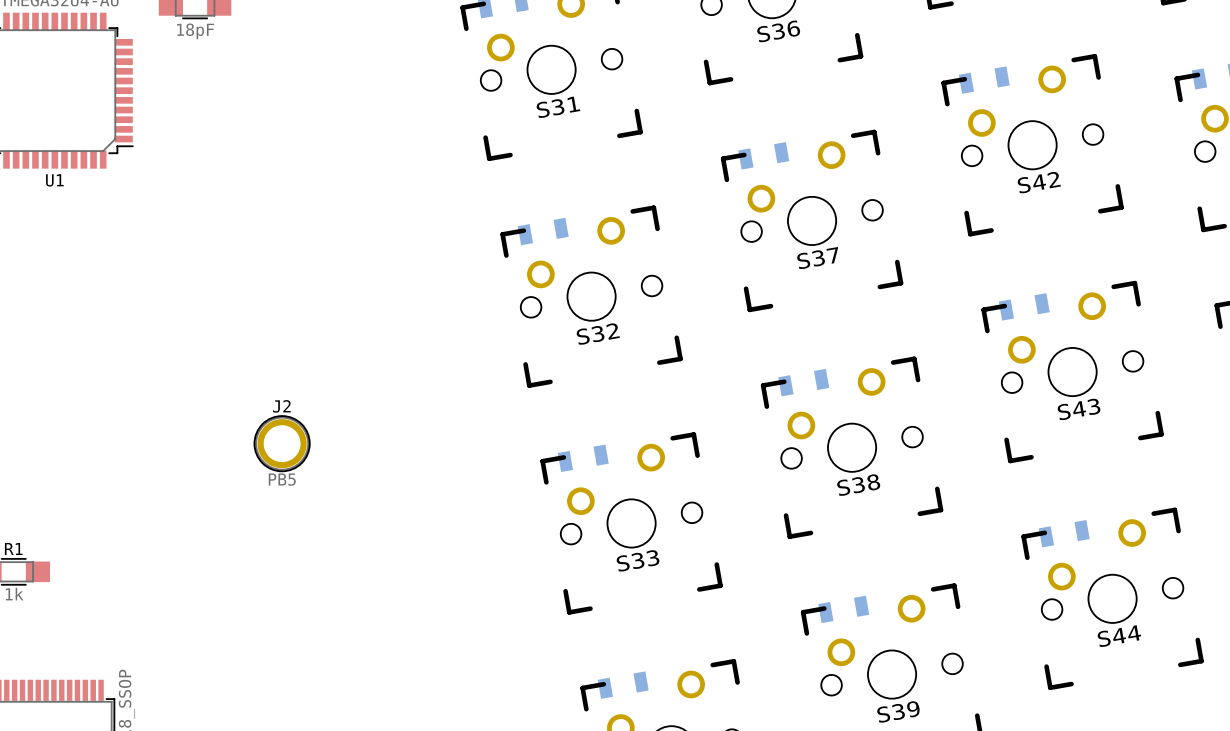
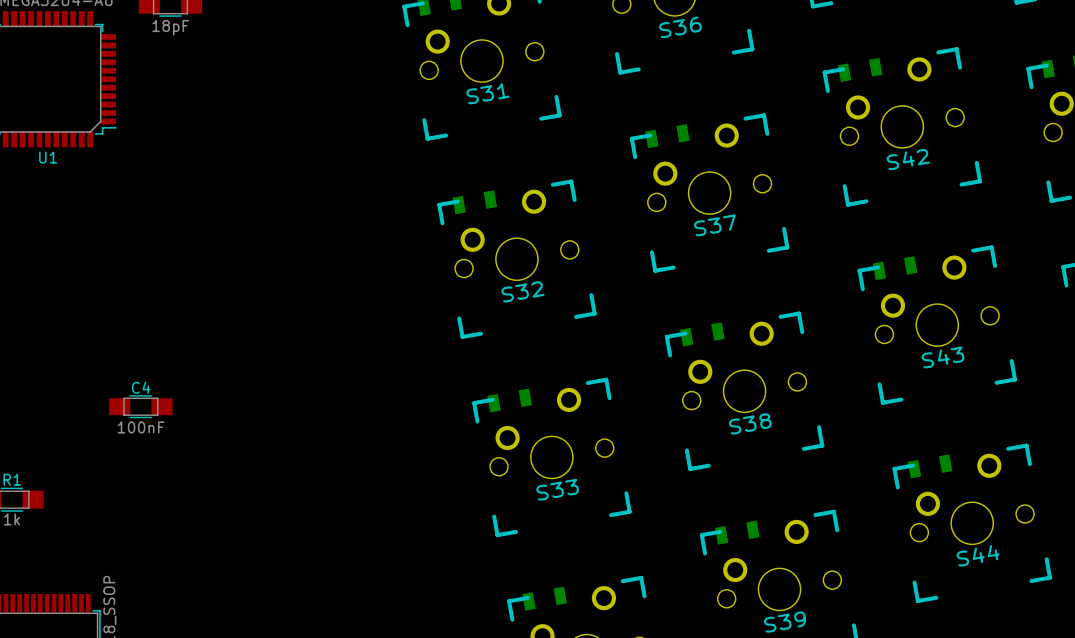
J2: PB5 (282, 443) -> none
C4: none -> 100nF (140, 406)

